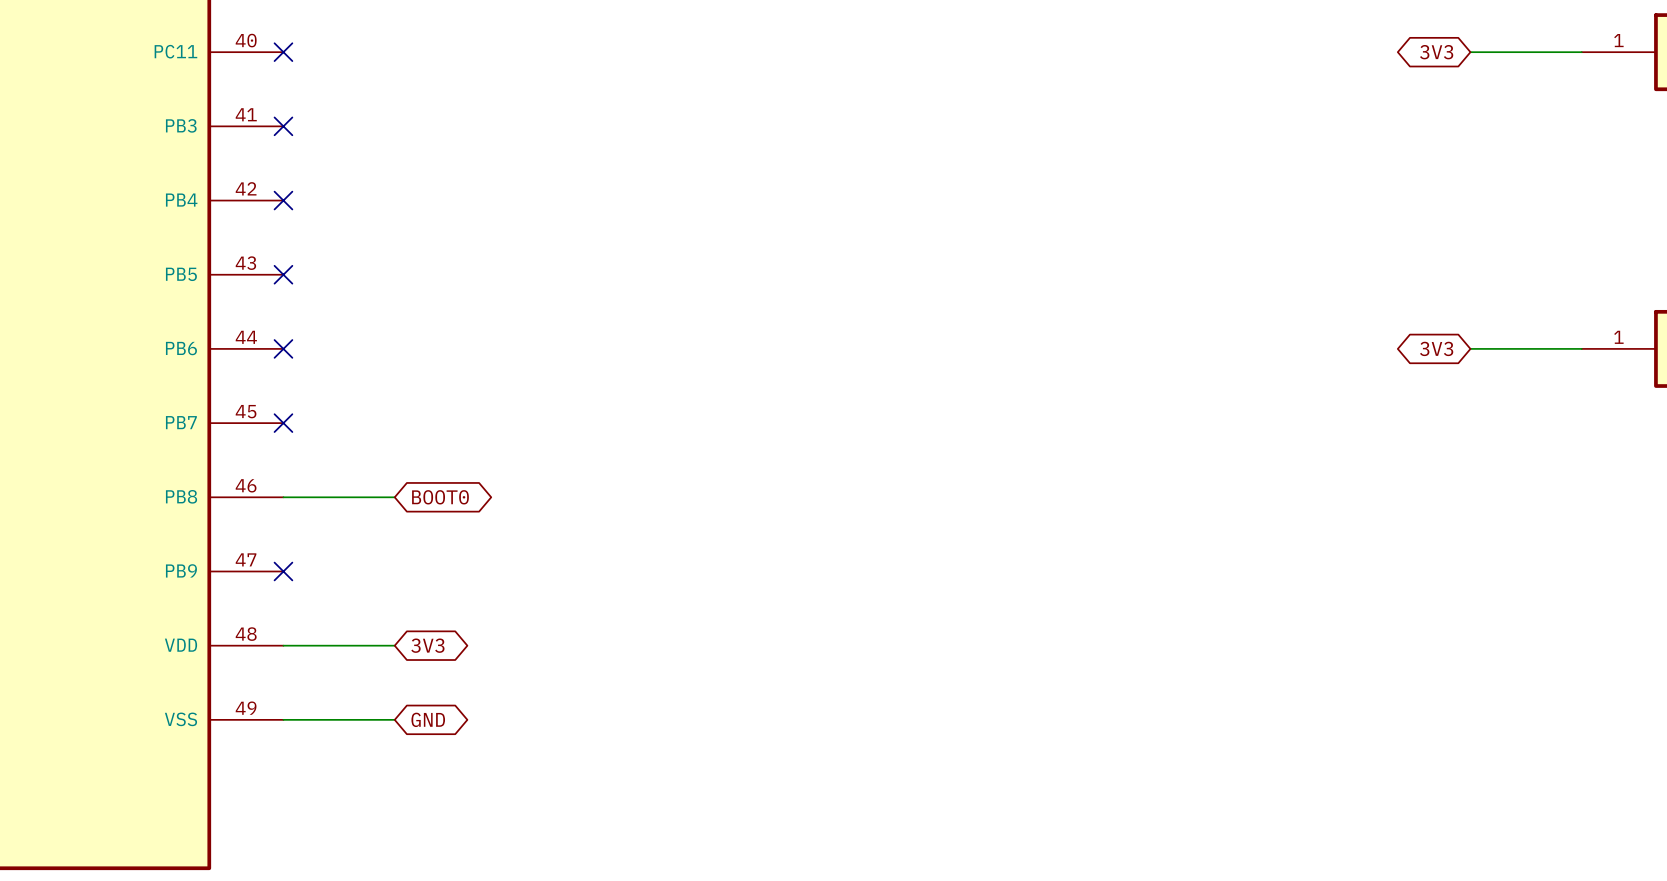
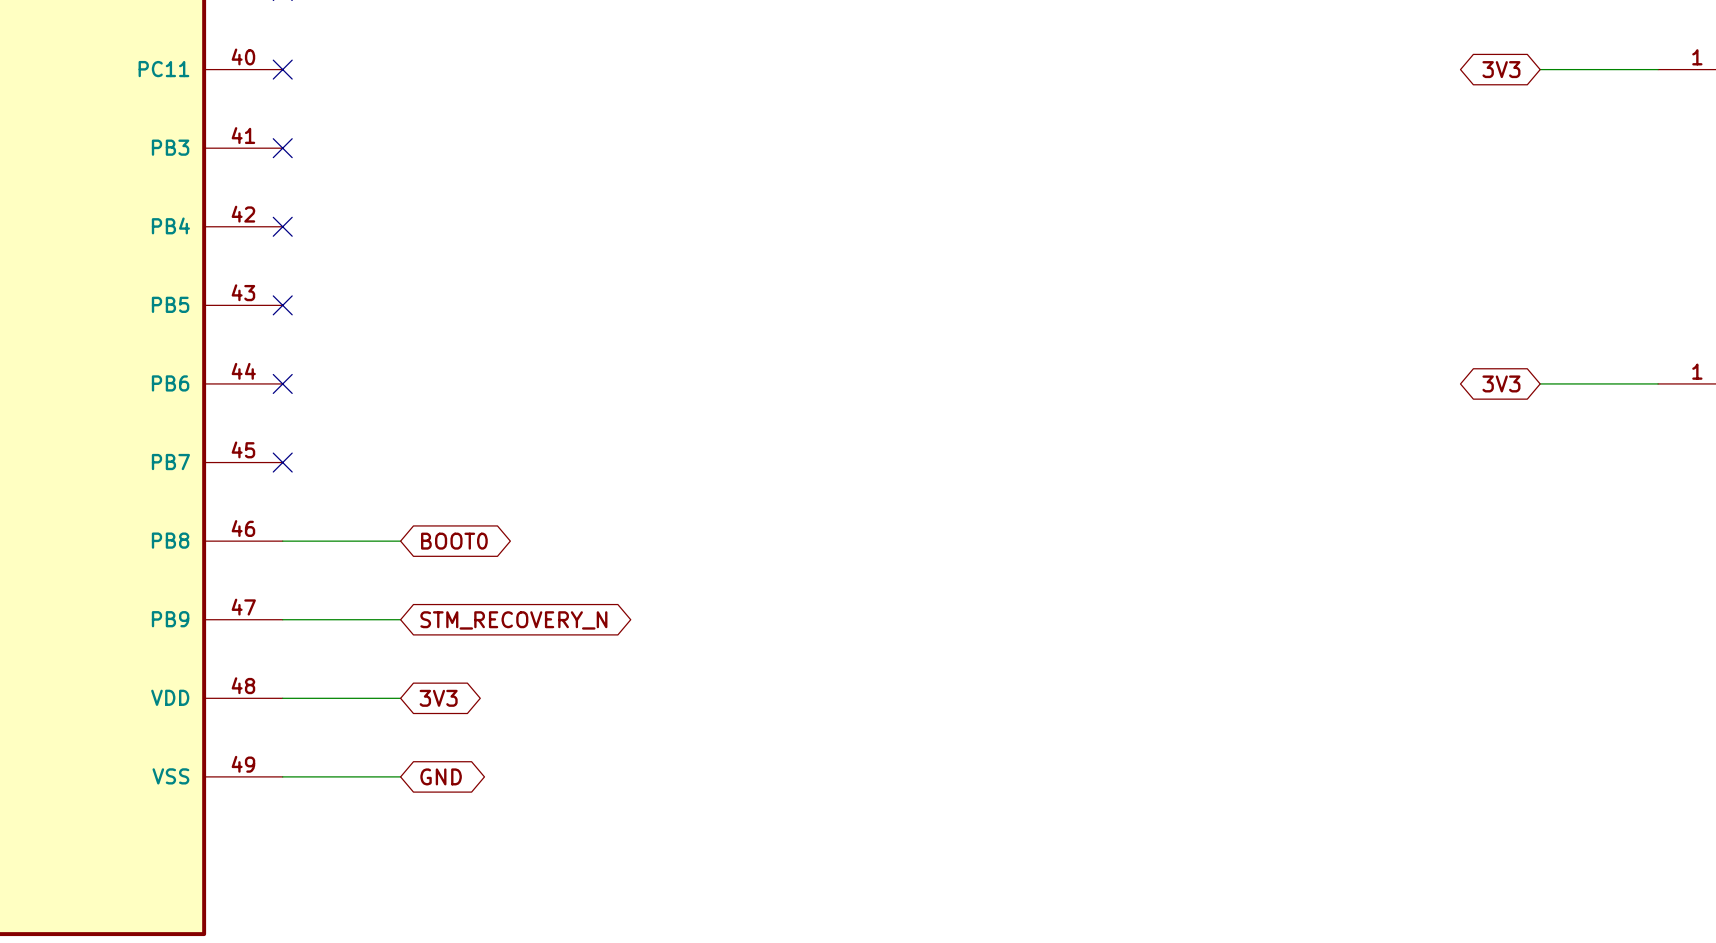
wire: none -> (282, 619) (400, 619)
no-connect mark: (283, 571) -> none
global label: none -> STM_RECOVERY_N (513, 620)

